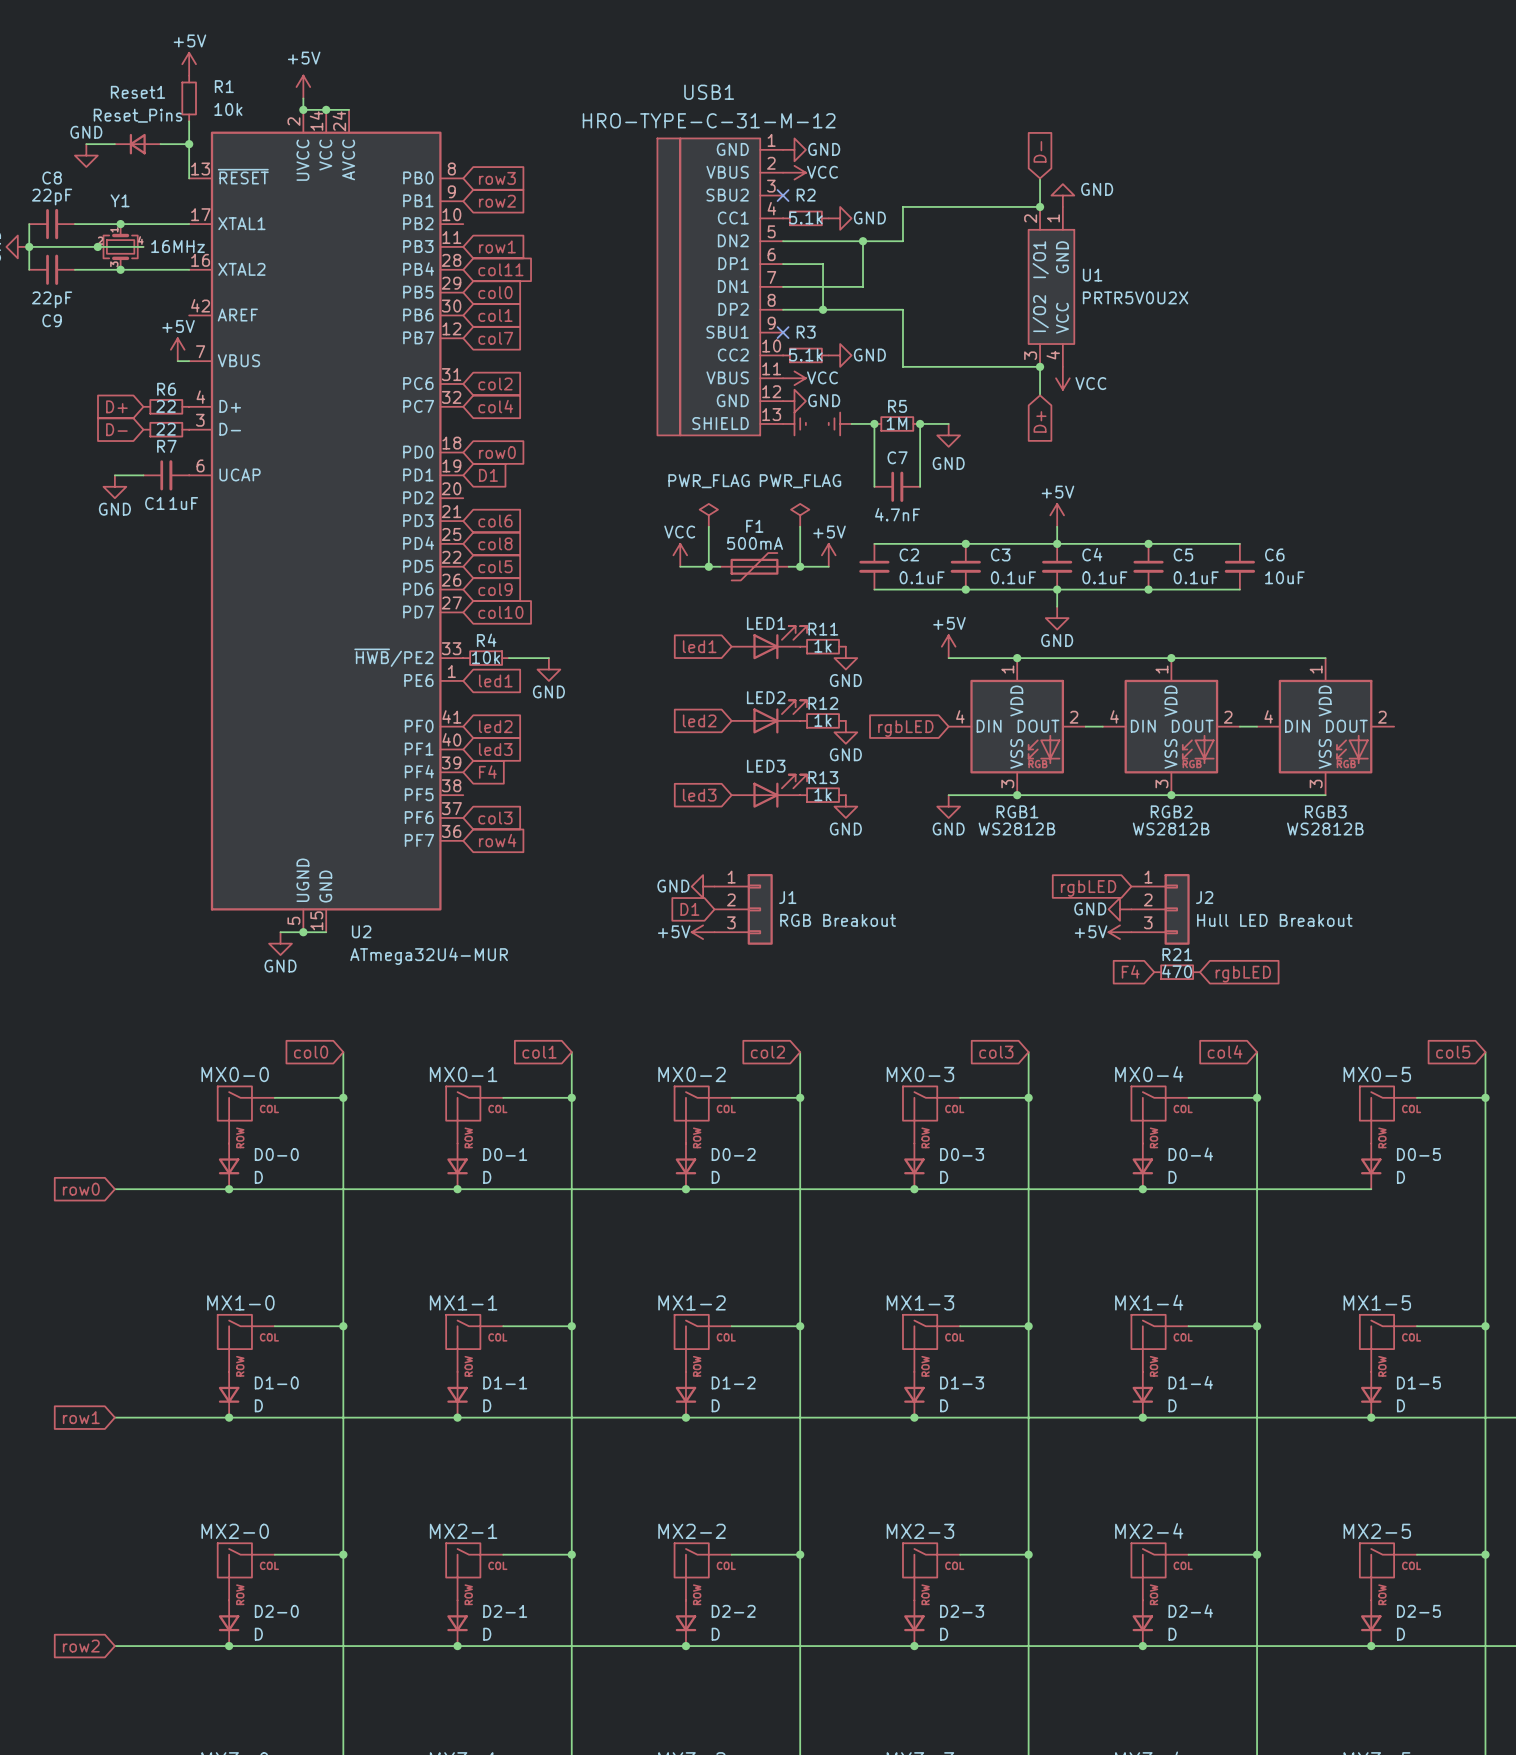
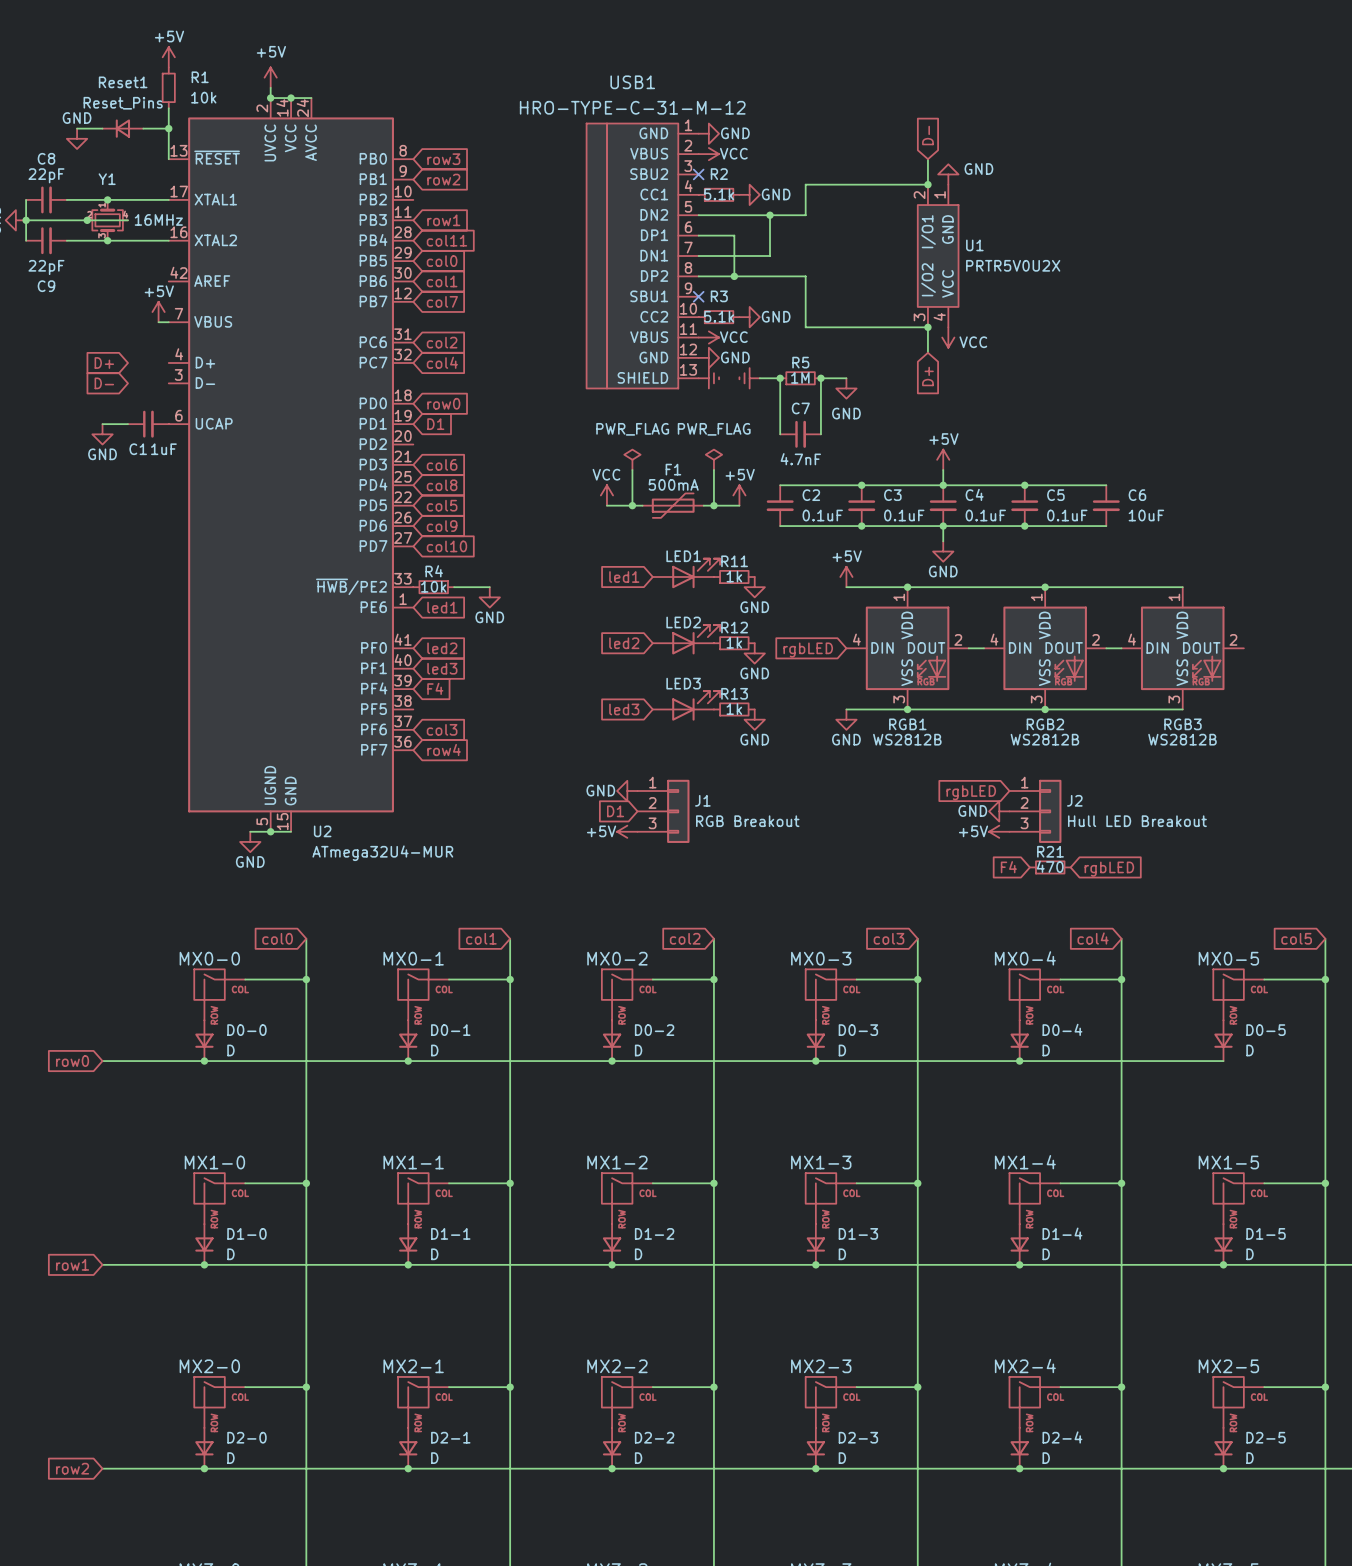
R6: 22 (166, 406) -> none
R7: 22 (166, 429) -> none

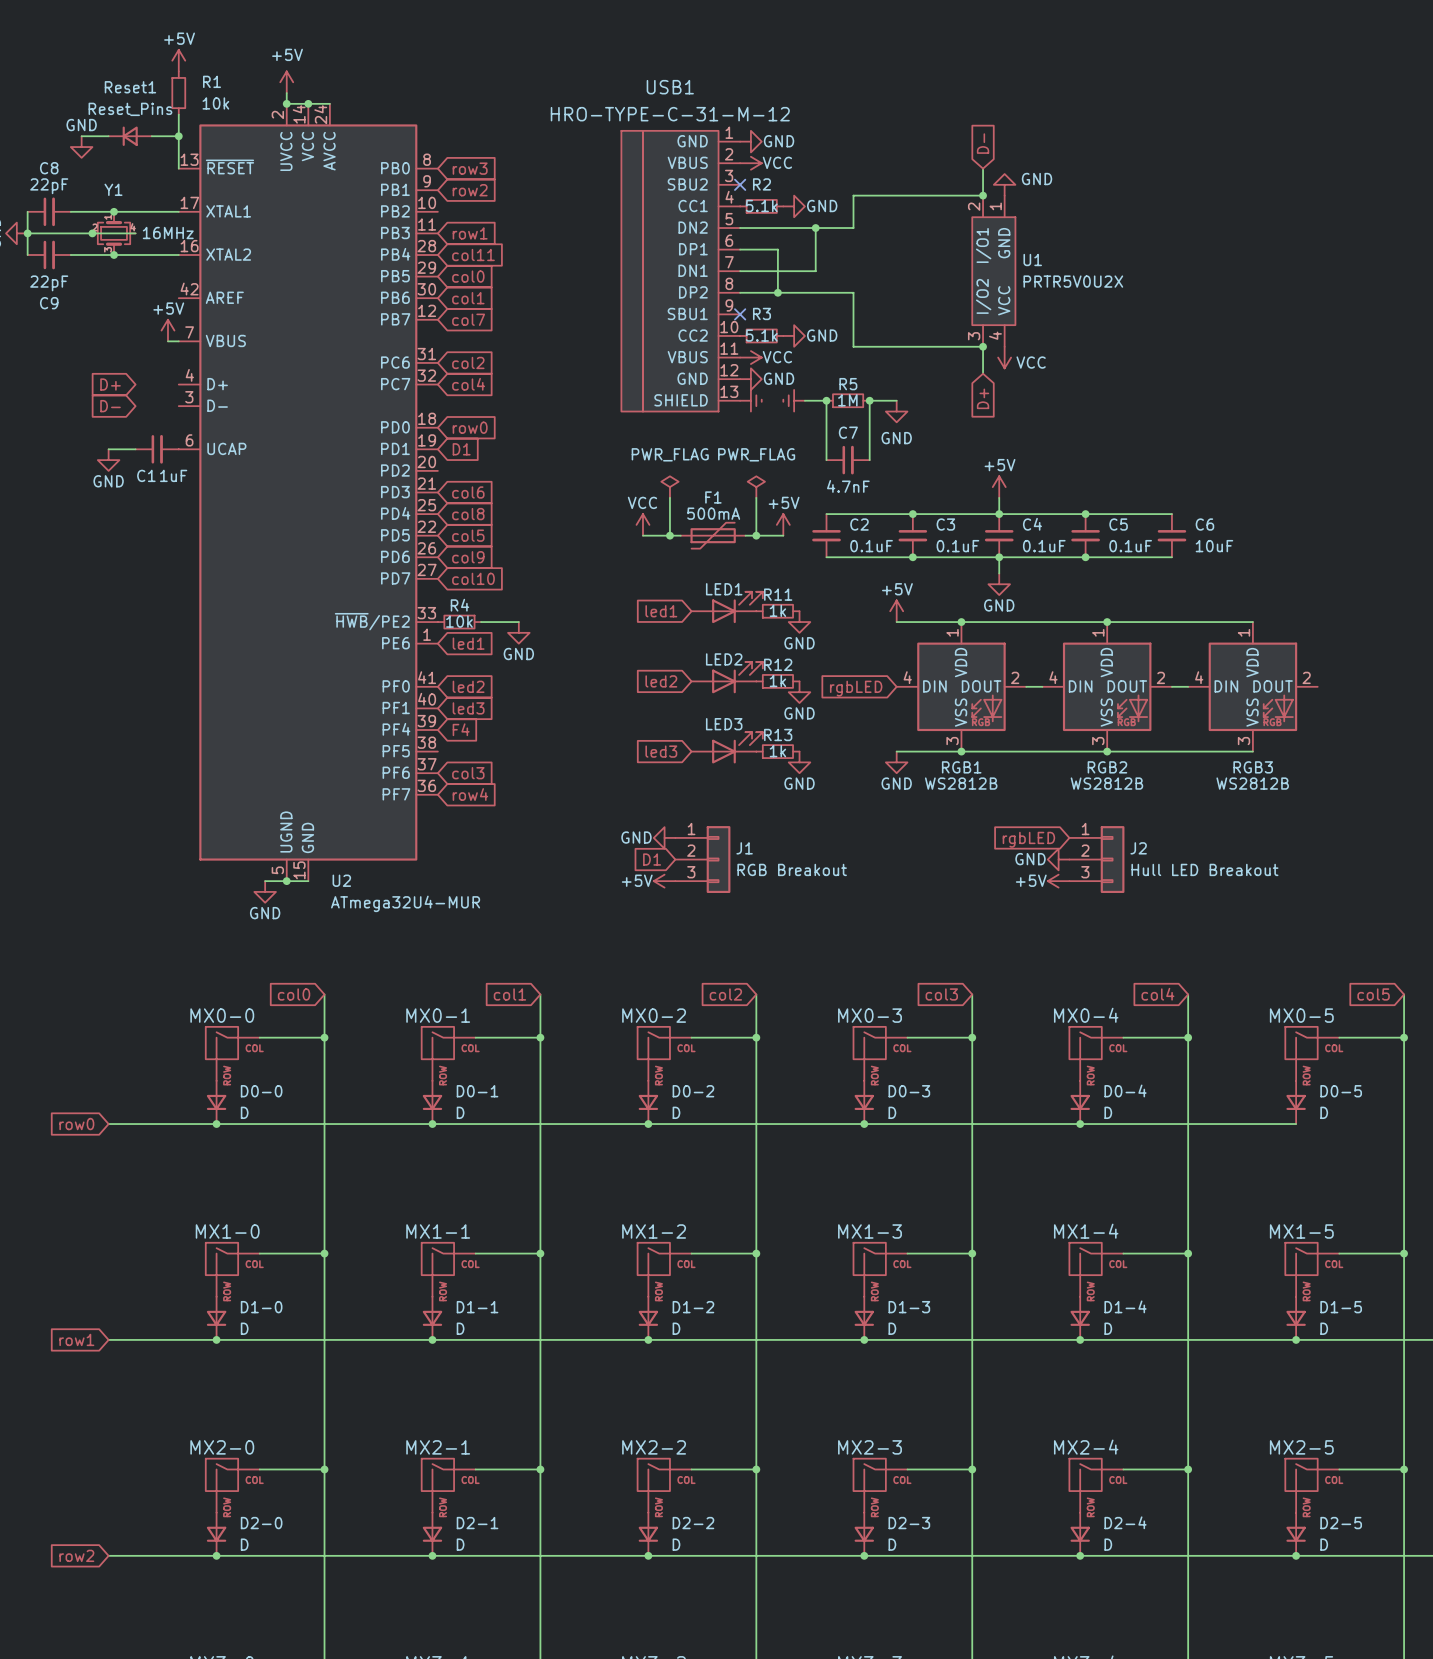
global label: F4 (1008, 867) -> none
R21: 470 (1050, 867) -> none
global label: rgbLED (1109, 869) -> none

